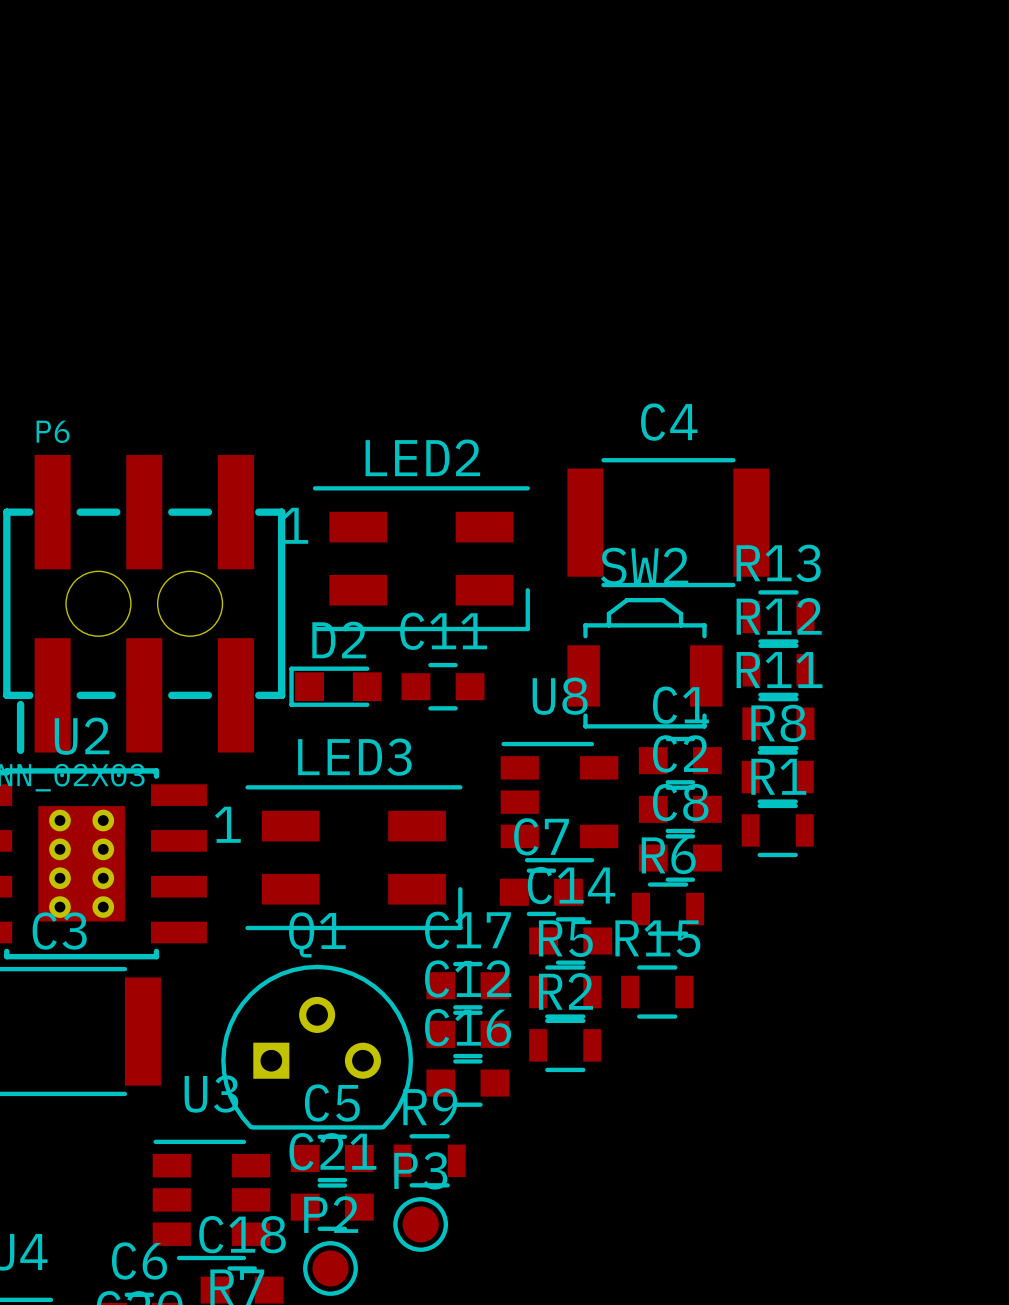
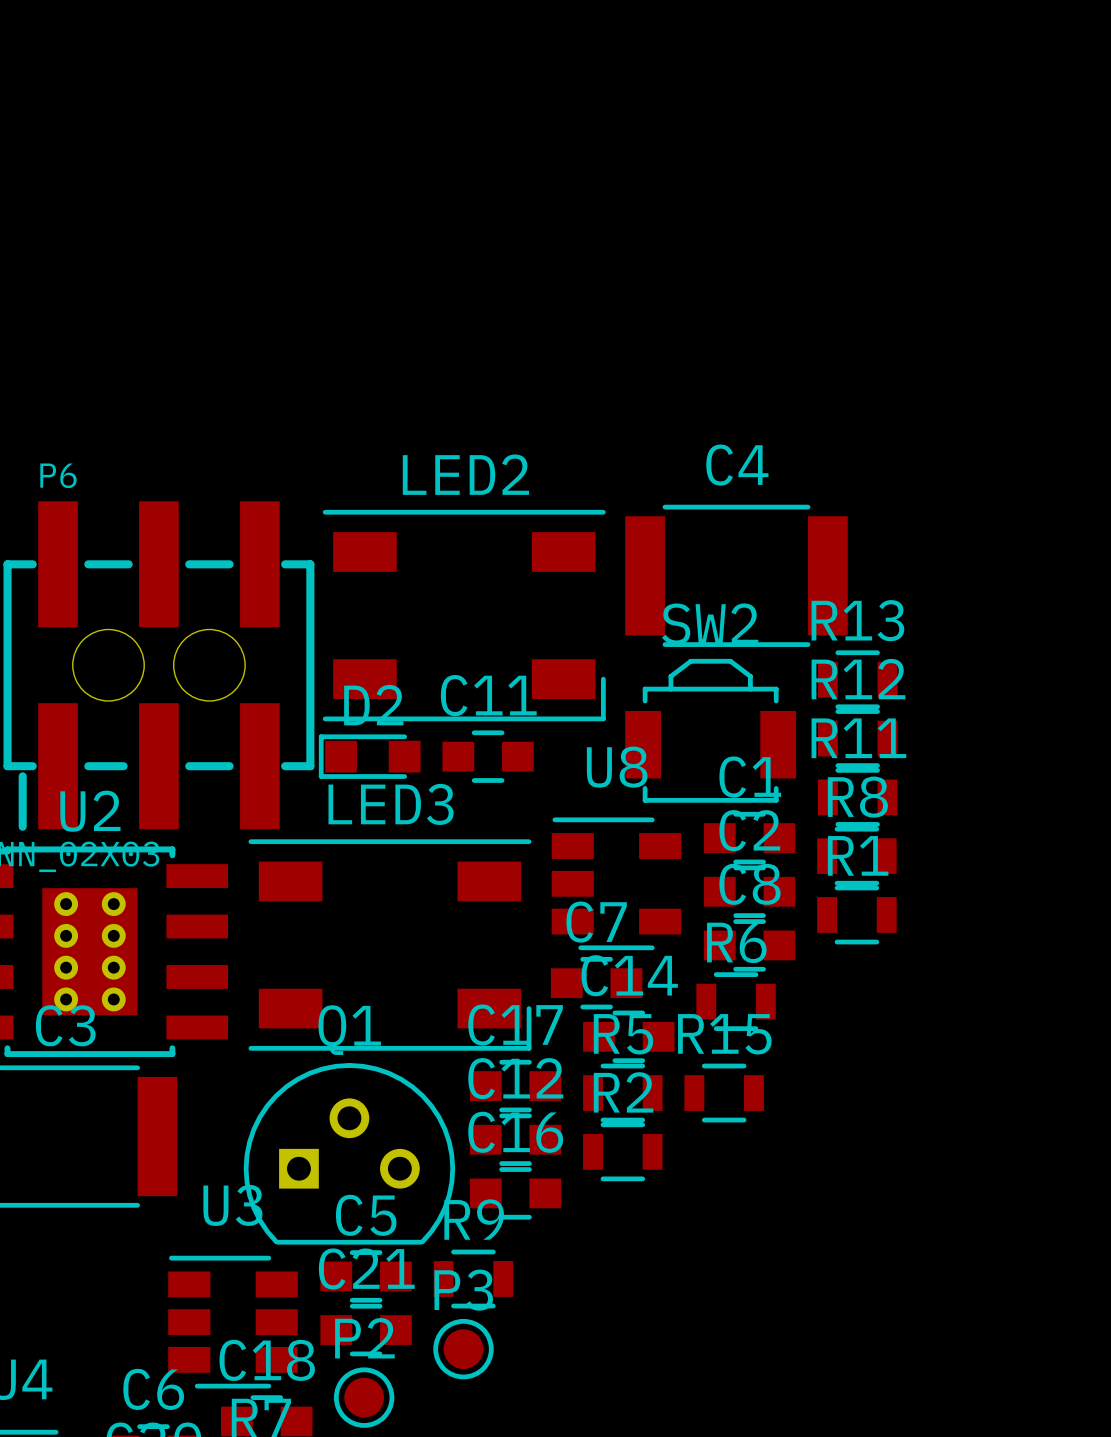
LED2 footprint: [312, 486, 530, 632] -> [322, 509, 606, 722]
LED3 footprint: [245, 785, 463, 931] -> [248, 839, 532, 1051]

